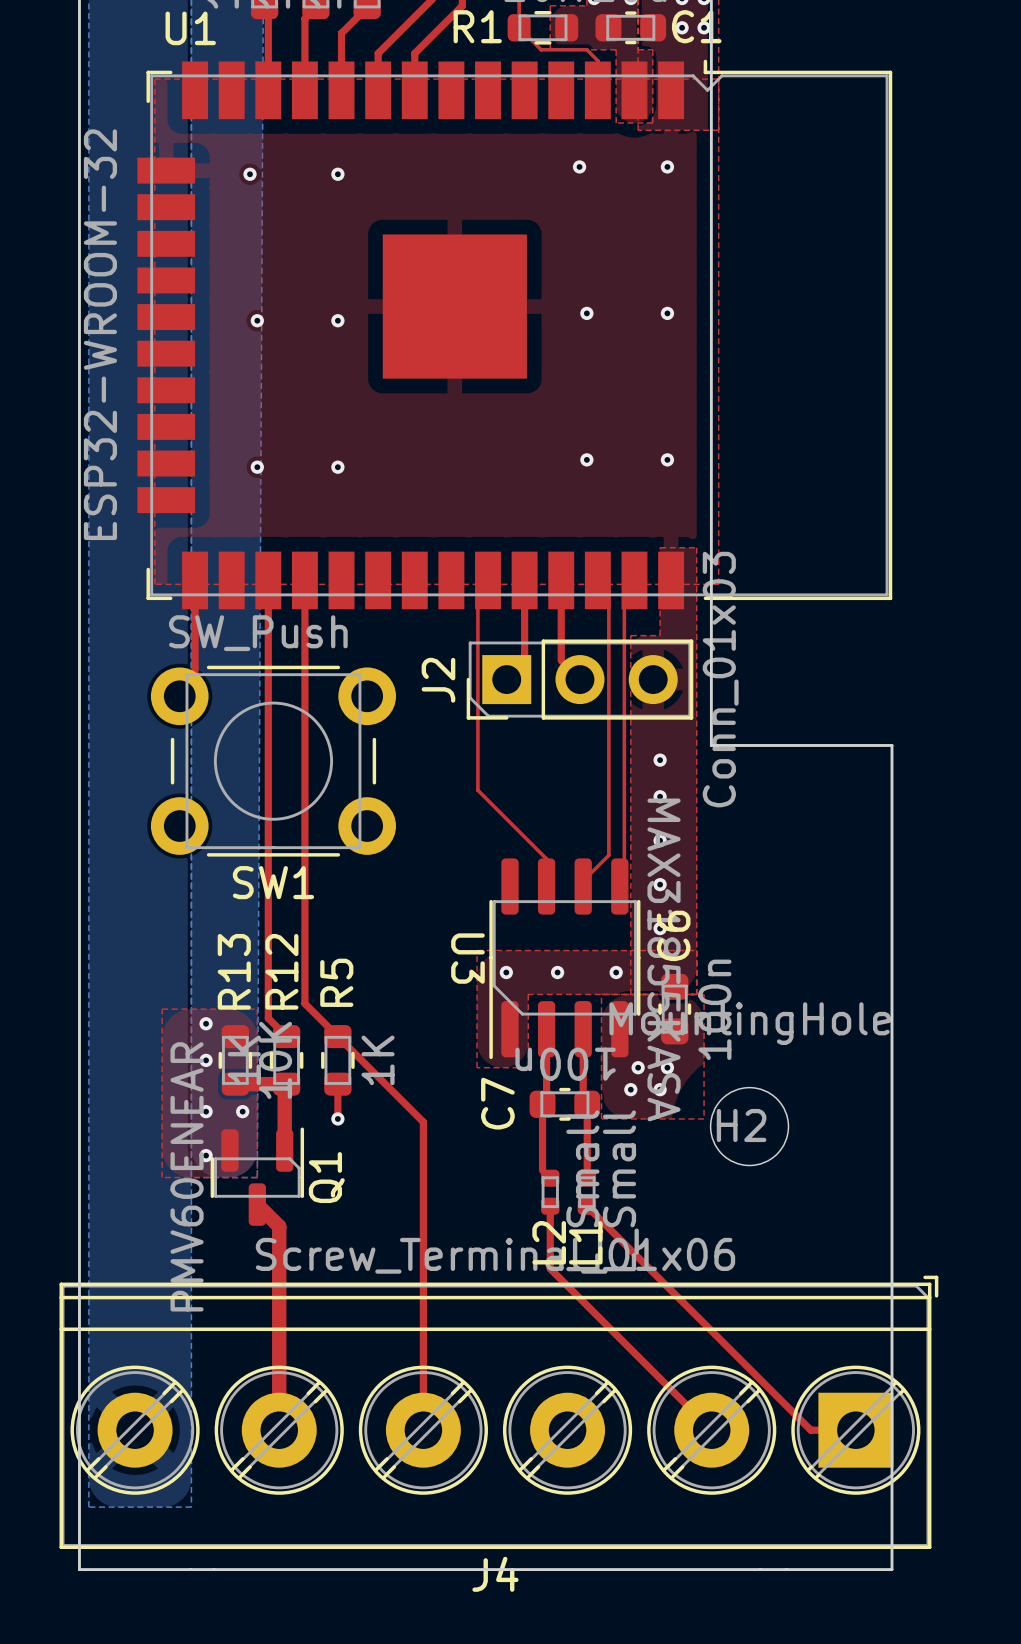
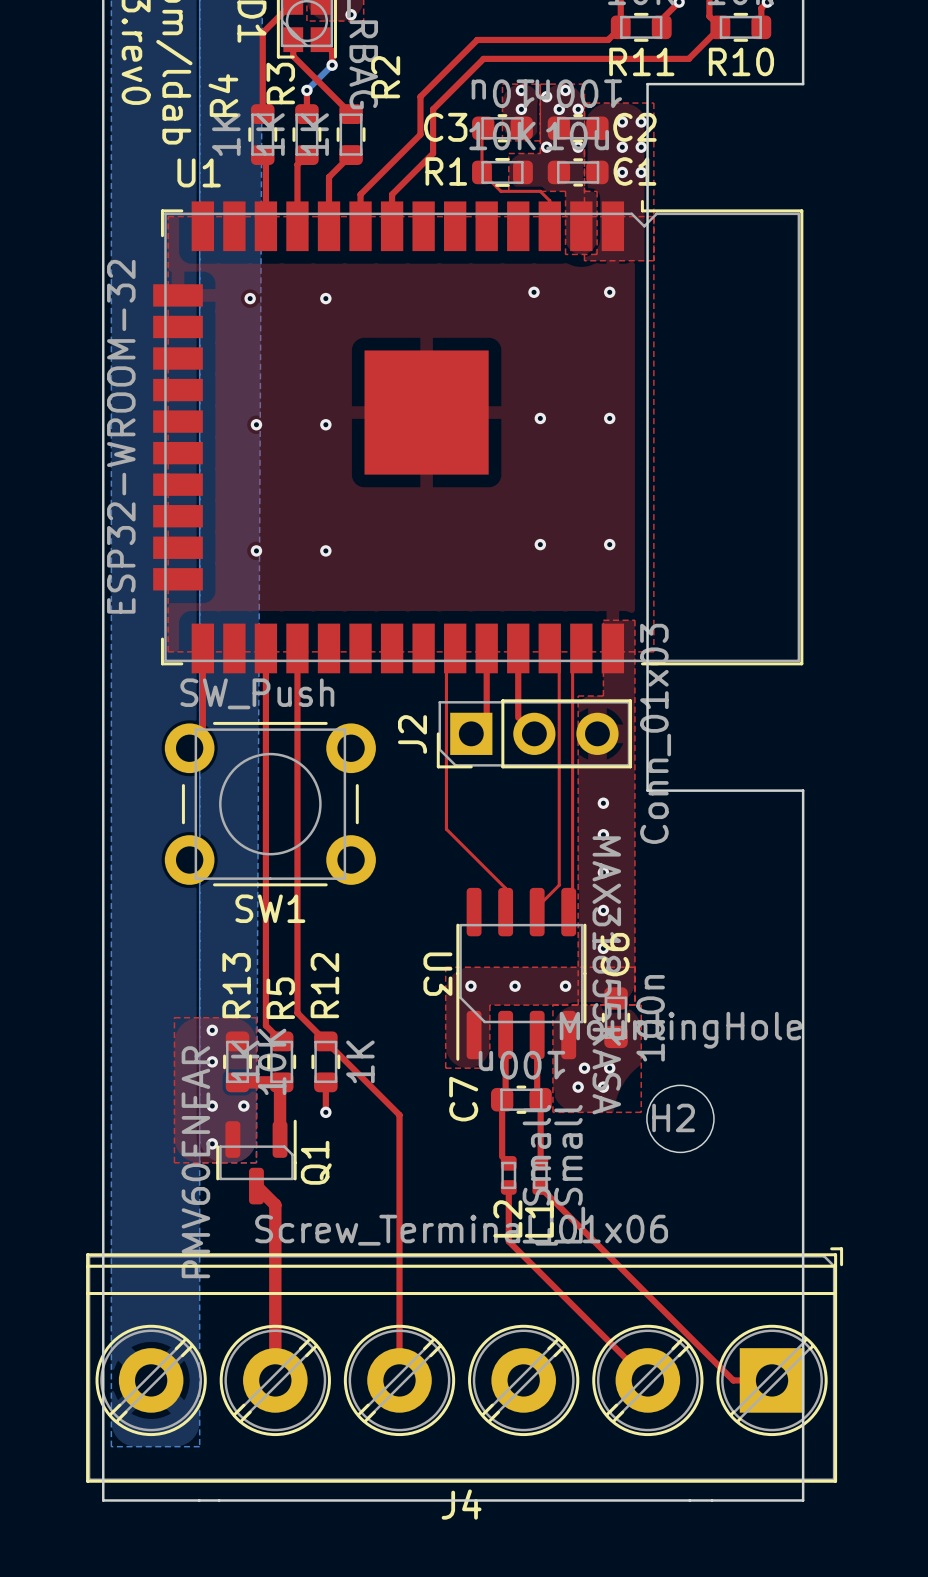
R12 name position: R12 (281, 971) -> R12 (324, 985)
R5 name position: R5 (336, 982) -> R5 (280, 998)

